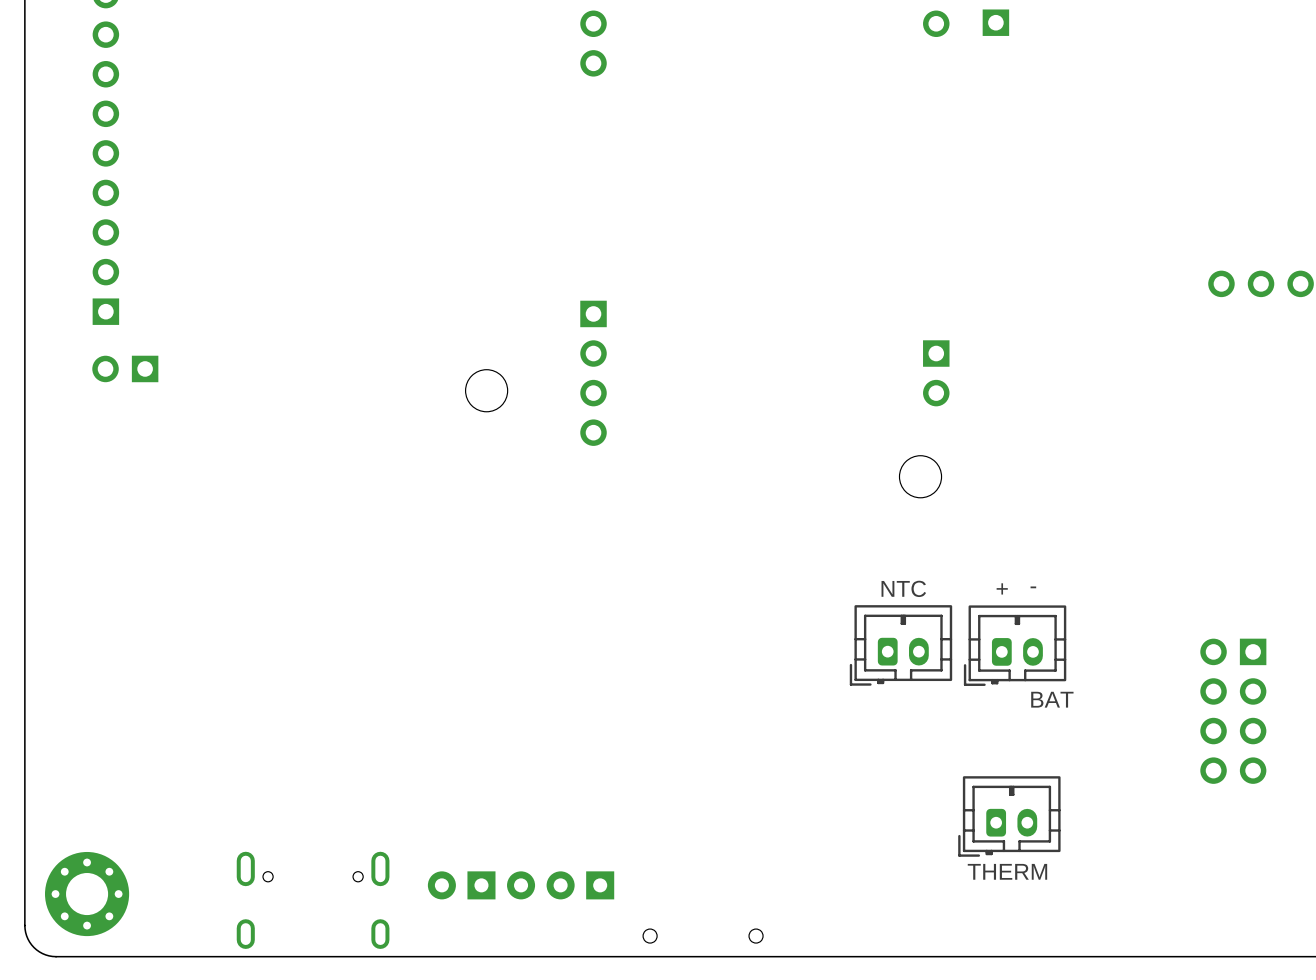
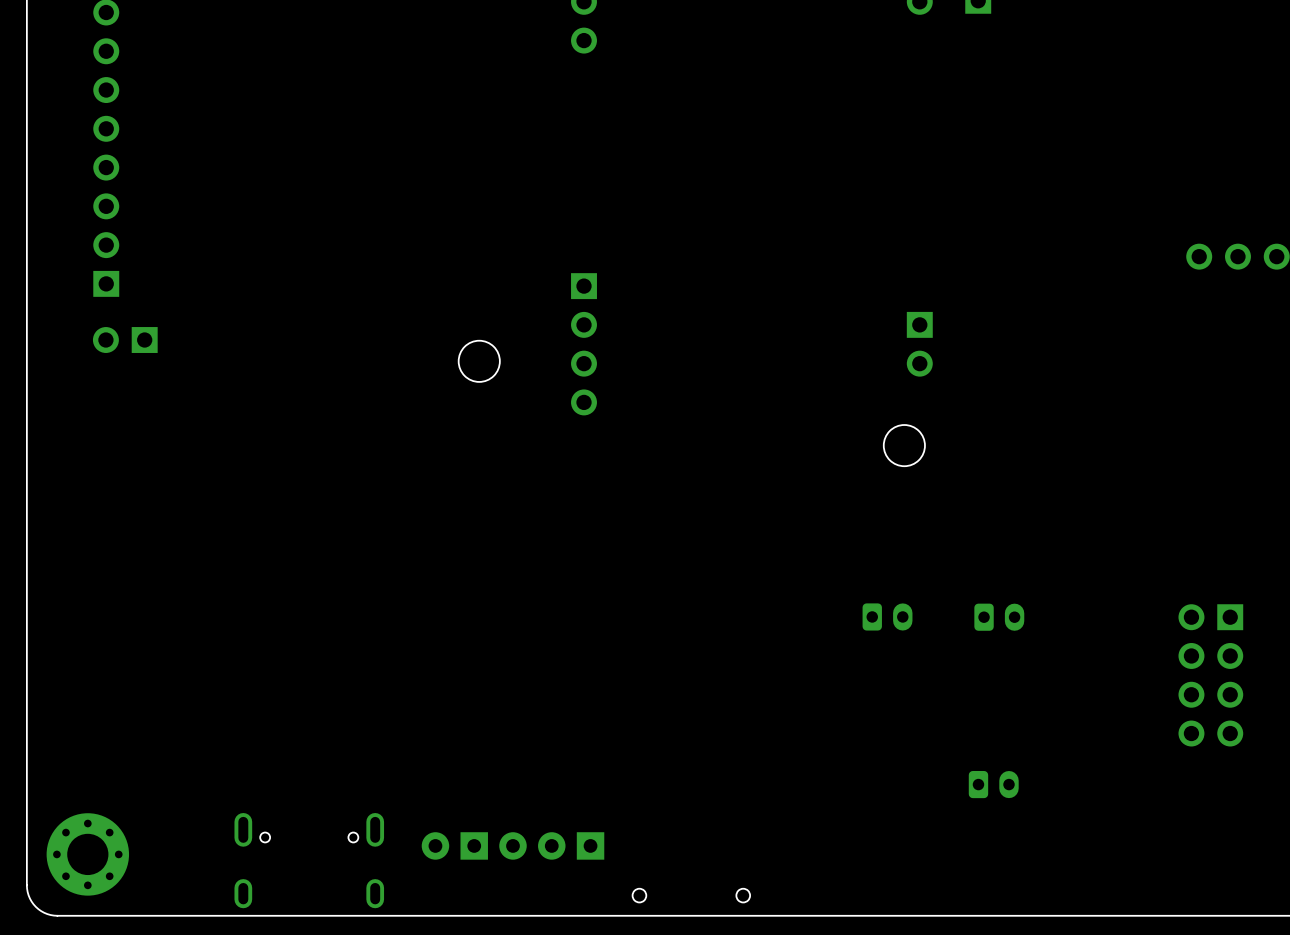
text: - (1033, 587) -> none
part text: NTC (903, 588) -> none
text: + (1002, 588) -> none
part footprint: [849, 605, 953, 686] -> [862, 603, 913, 631]
part footprint: [963, 605, 1067, 686] -> [974, 603, 1025, 631]
part text: BAT (1052, 699) -> none
part footprint: [958, 776, 1061, 857] -> [968, 770, 1019, 799]
part value: THERM (1007, 871) -> none

